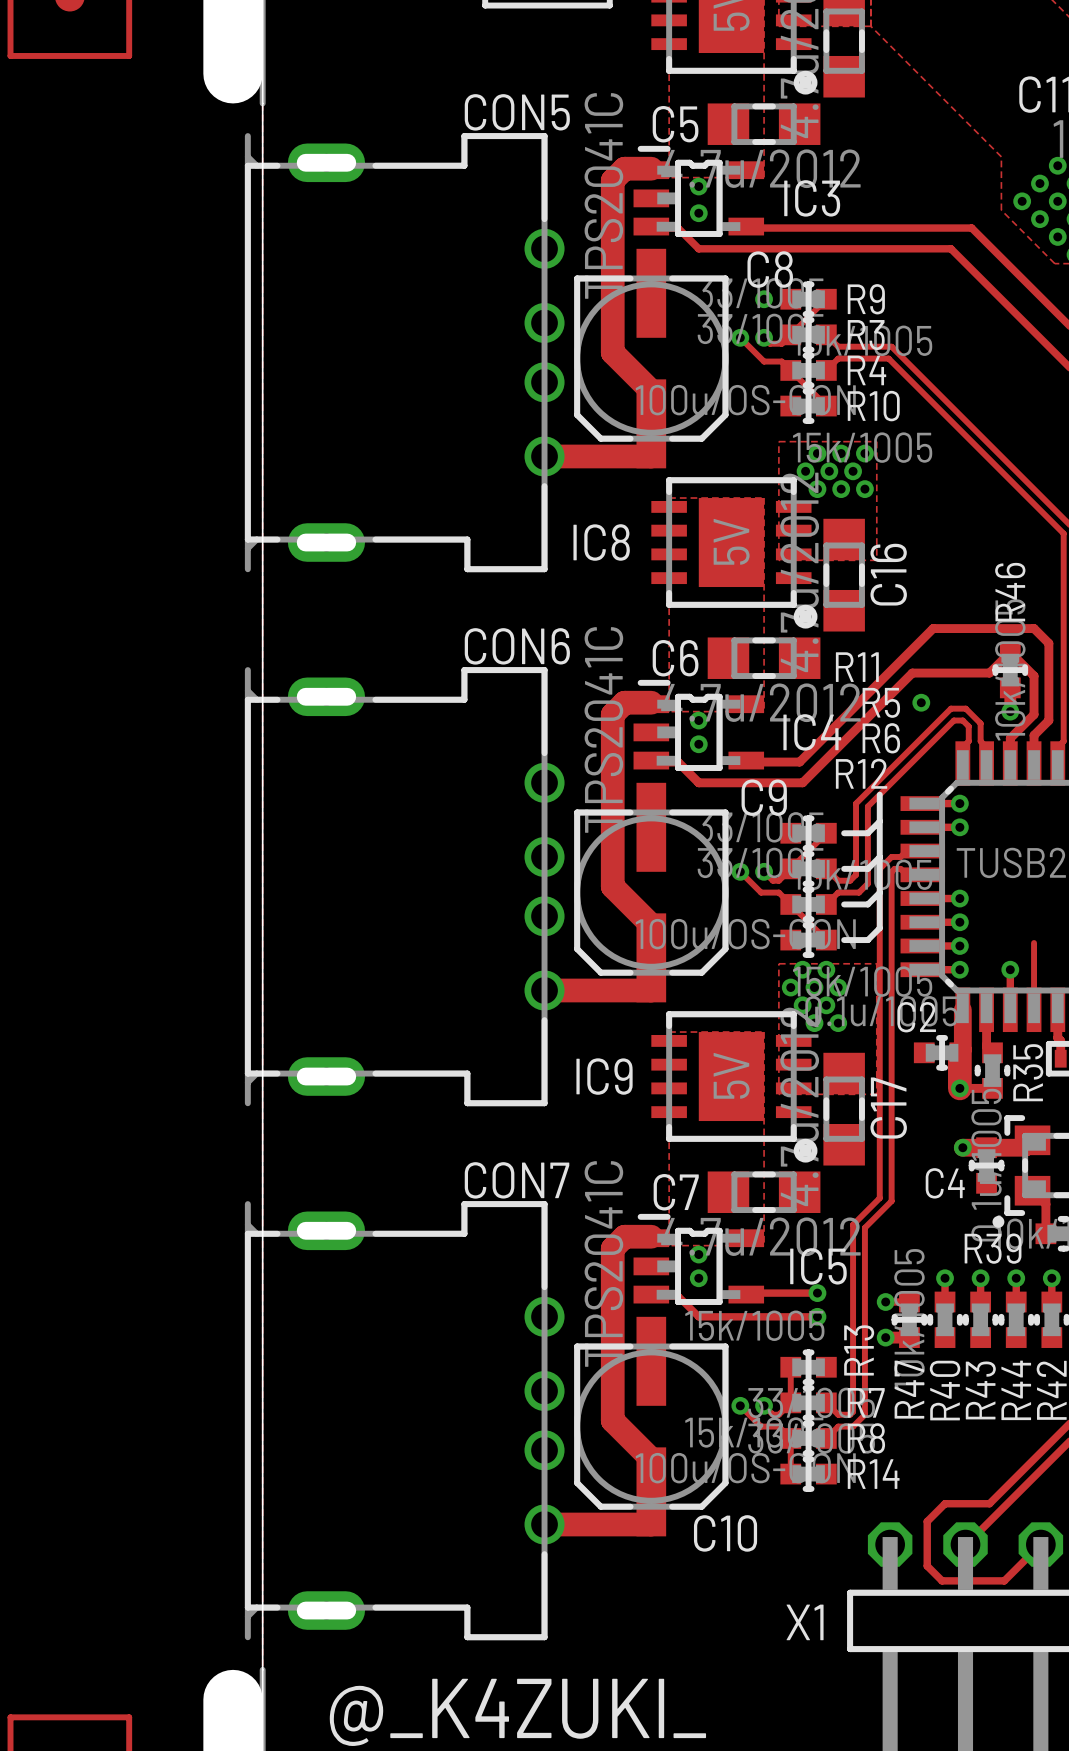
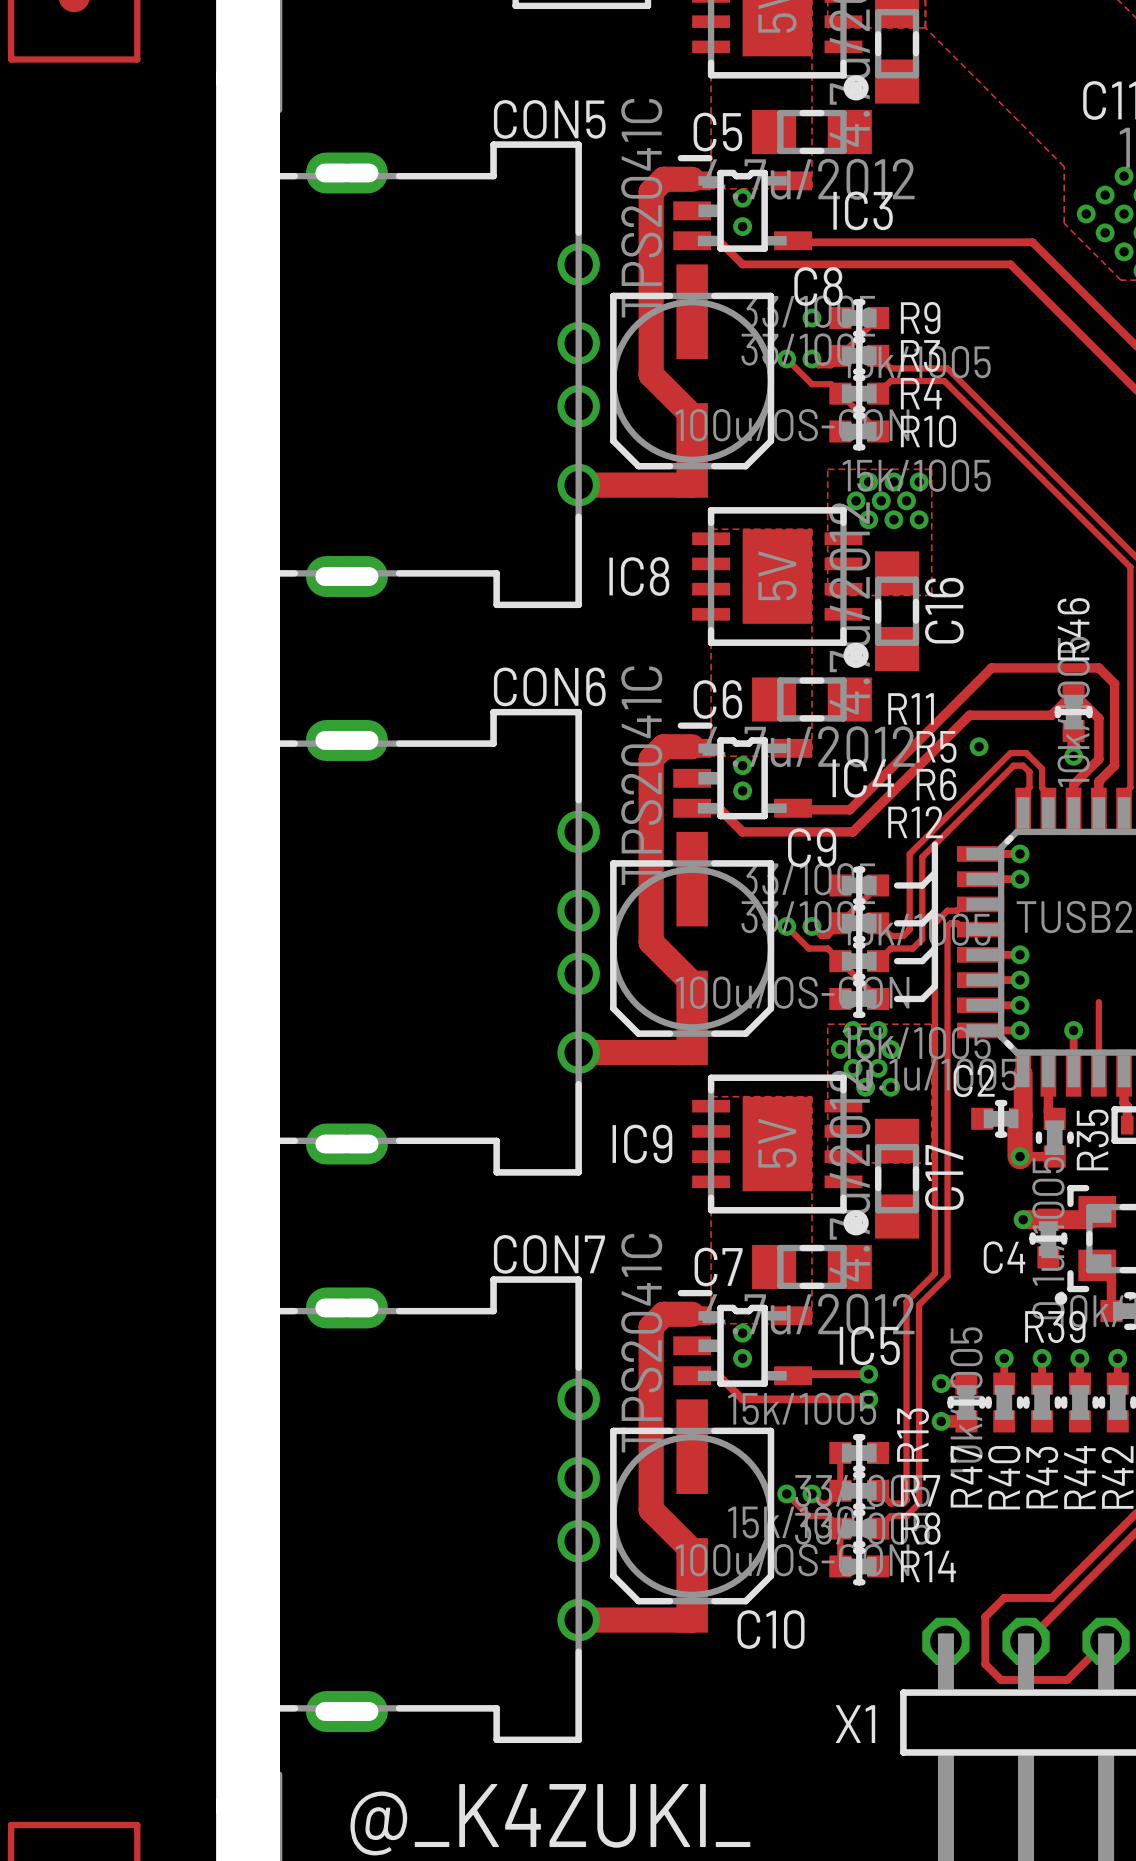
board edge: none -> (247, 78) (247, 1806)

